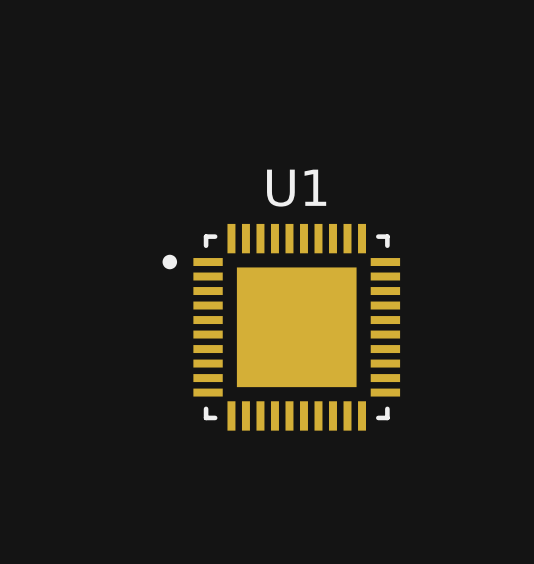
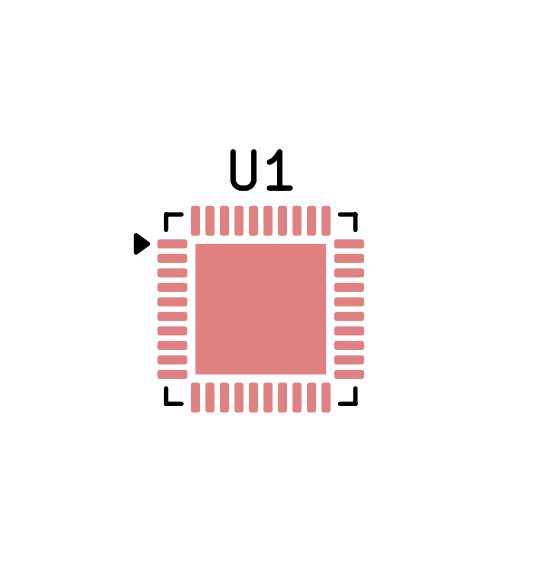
U1 footprint: [162, 223, 401, 431] -> [133, 205, 365, 413]

